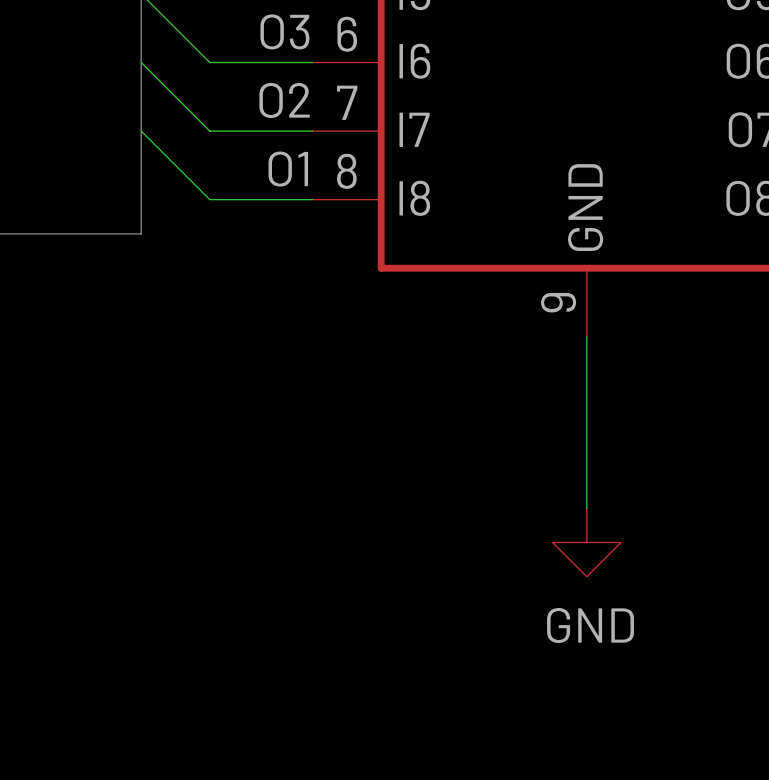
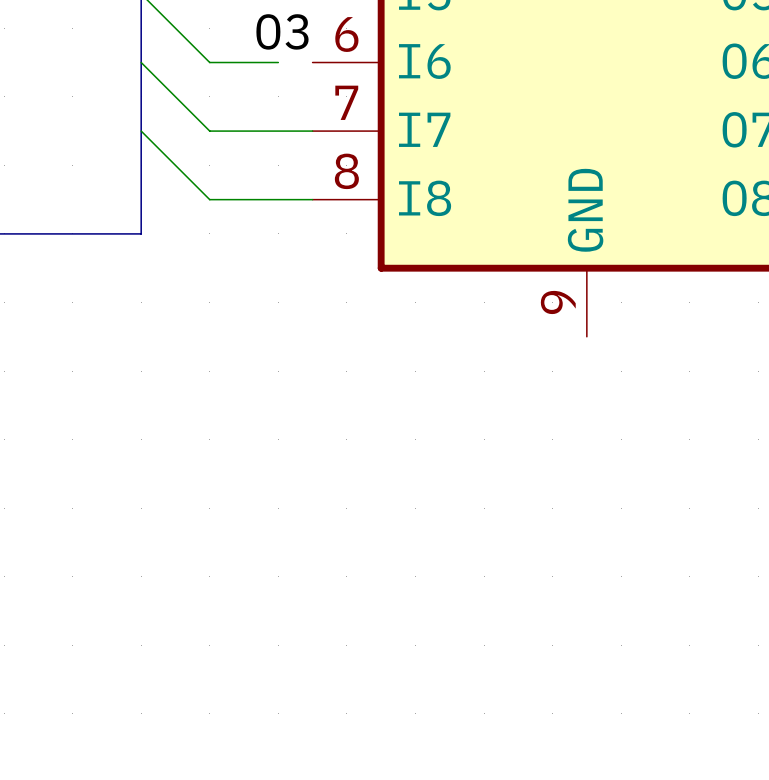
wire: (278, 62) (312, 62) -> none
label: O2 (284, 100) -> none
label: O1 (288, 169) -> none
wire: (586, 336) (586, 508) -> none
power symbol: GND (586, 542) -> none

